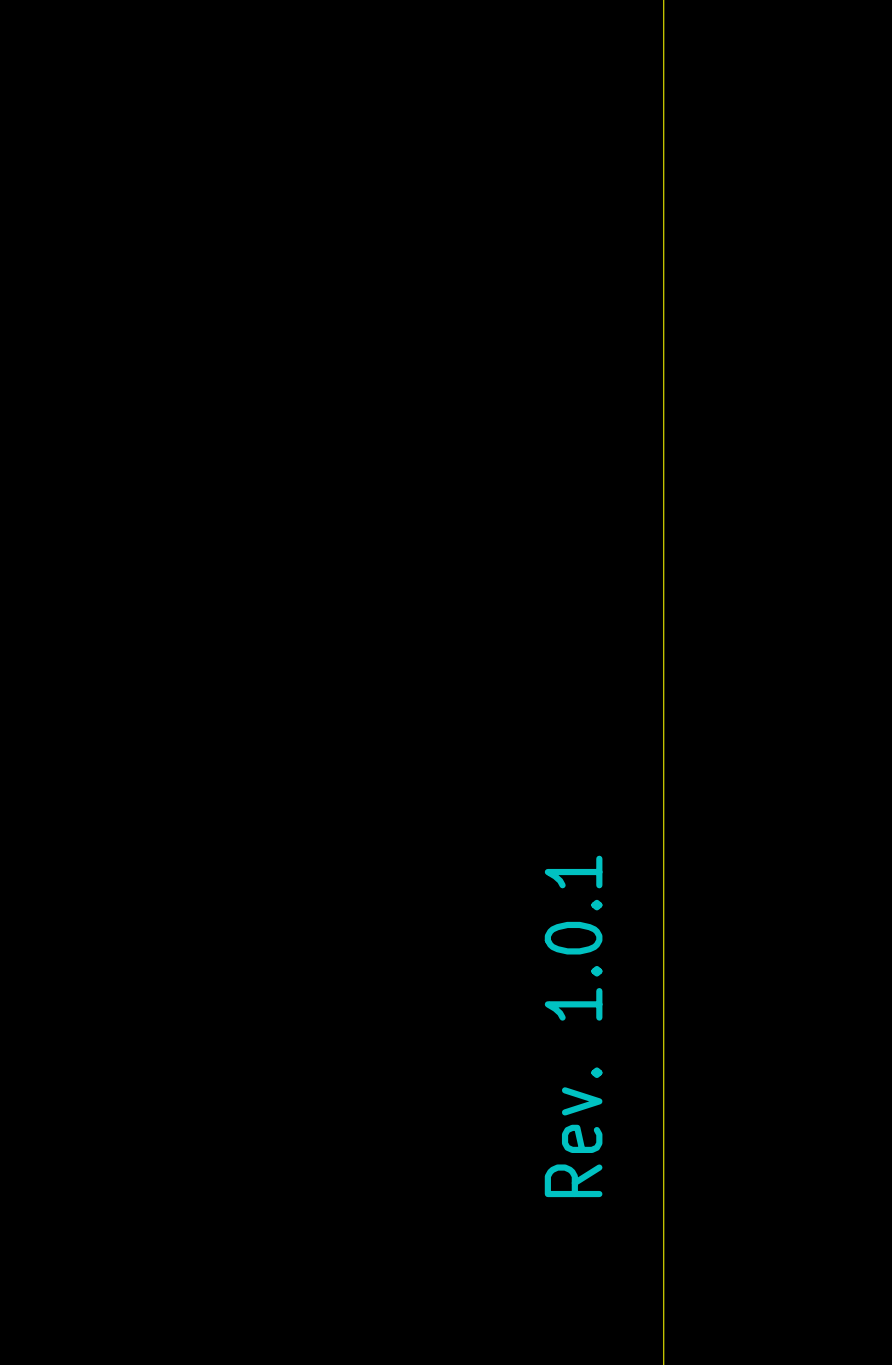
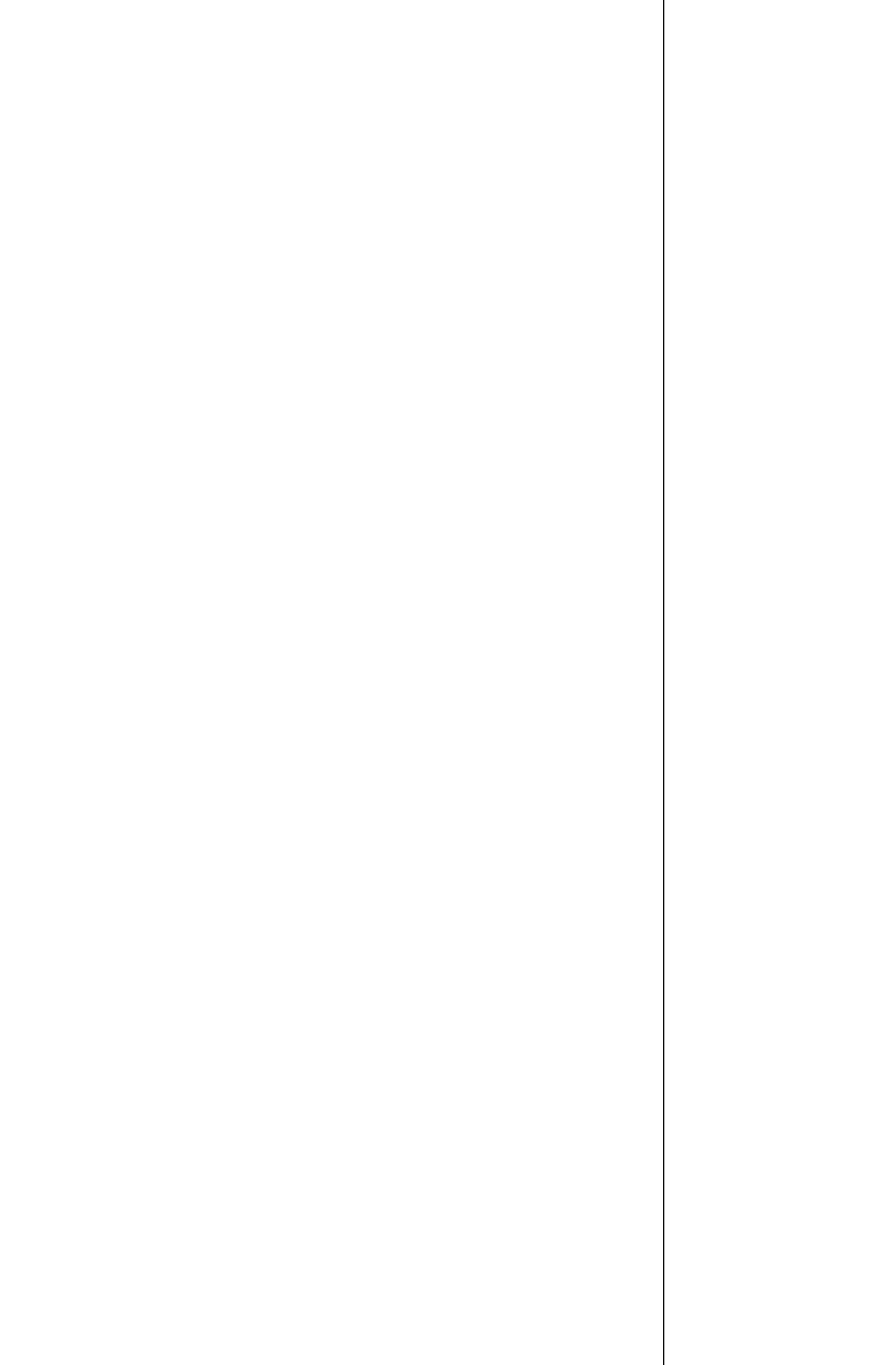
text: Rev. 1.0.1 (573, 1026) -> none

